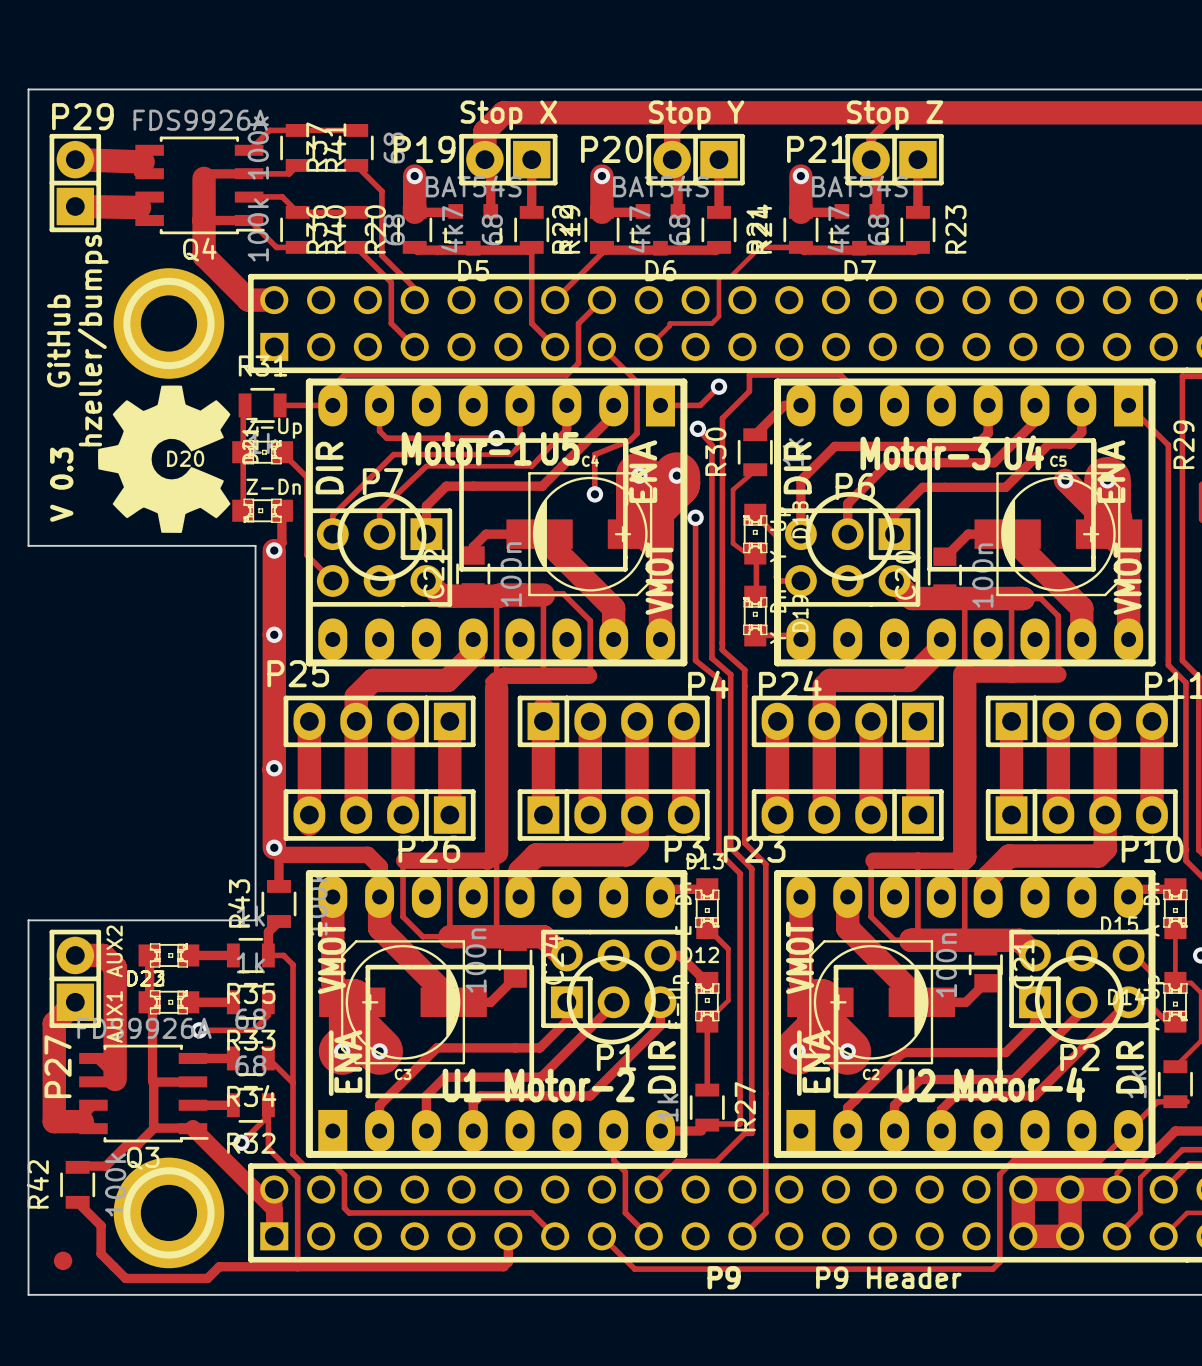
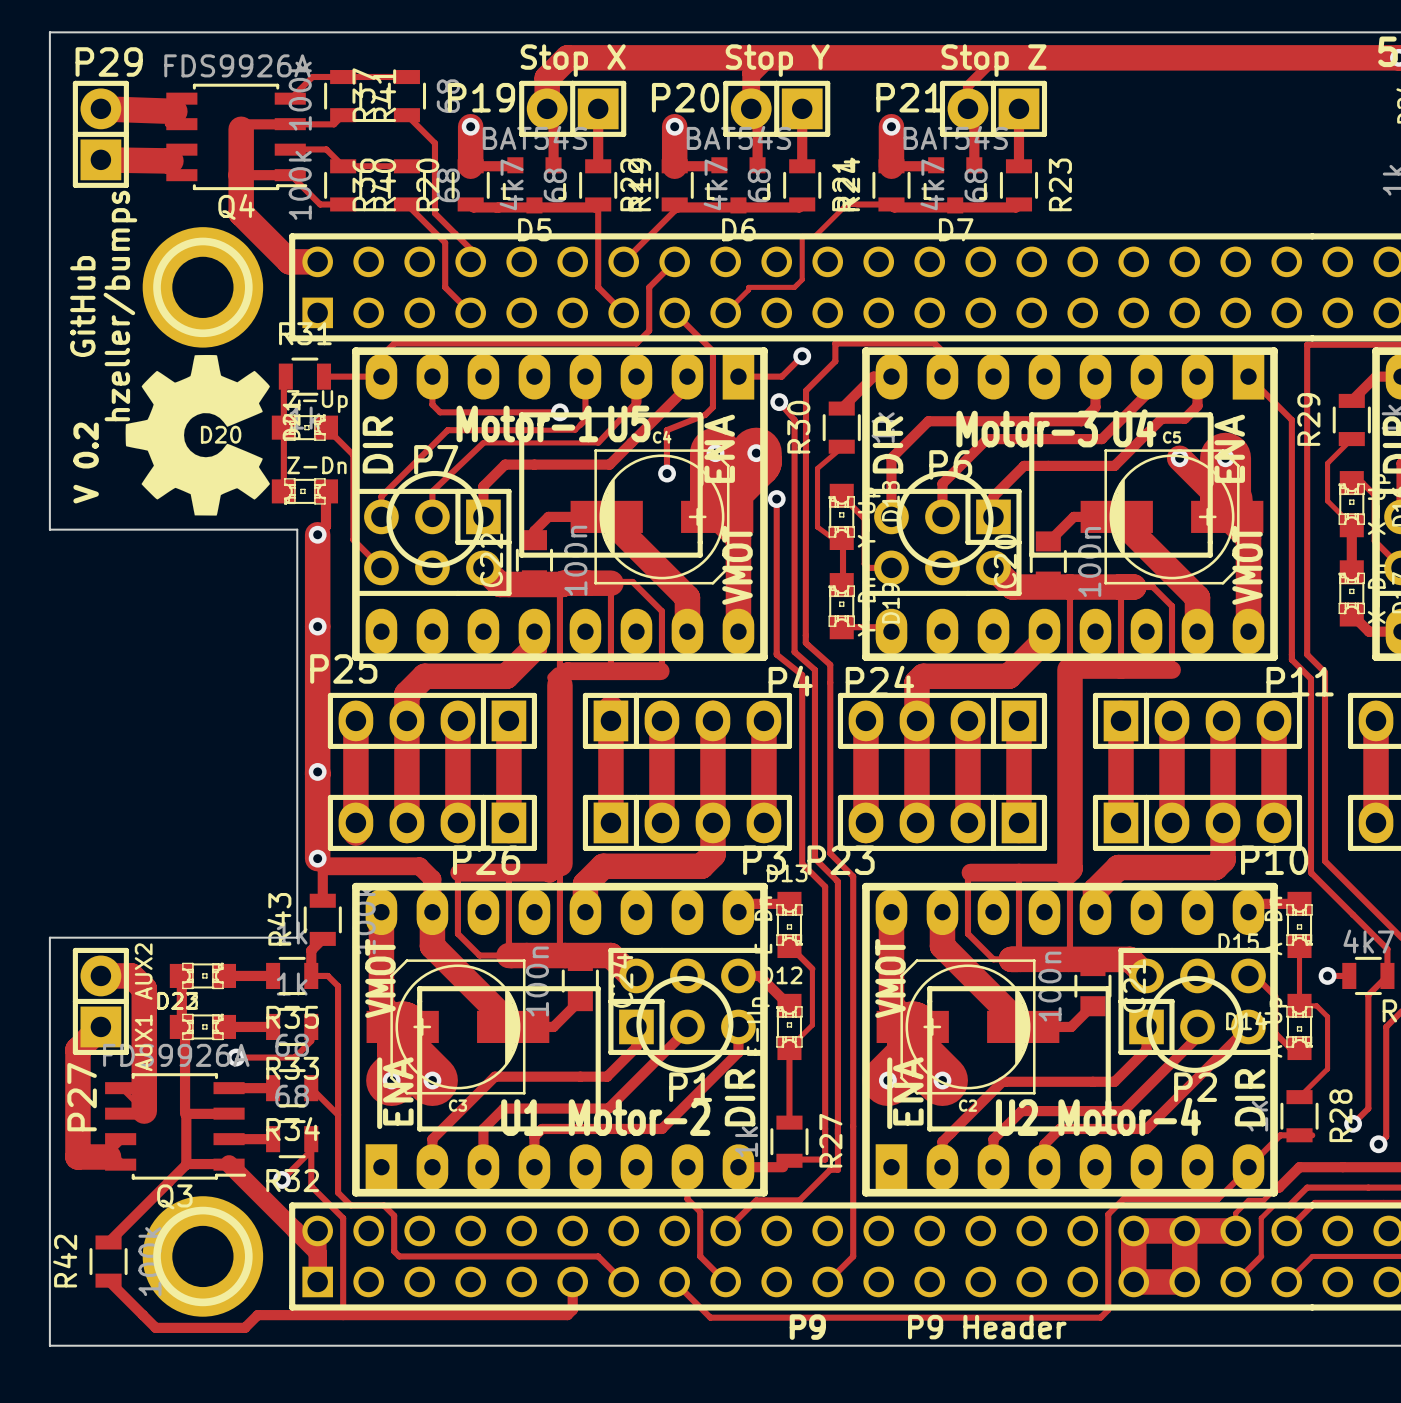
text: V 0.3 (61, 484) -> V 0.2 (86, 463)
track: (137, 1145) (126, 1145) (105, 1166) (77, 1167) -> (168, 1182) (108, 1242)
R42 position: (77, 1184) -> (108, 1261)
track: (77, 1202) (101, 1225) (101, 1253) -> (108, 1280) (128, 1301)
part: (63, 1260) -> none

